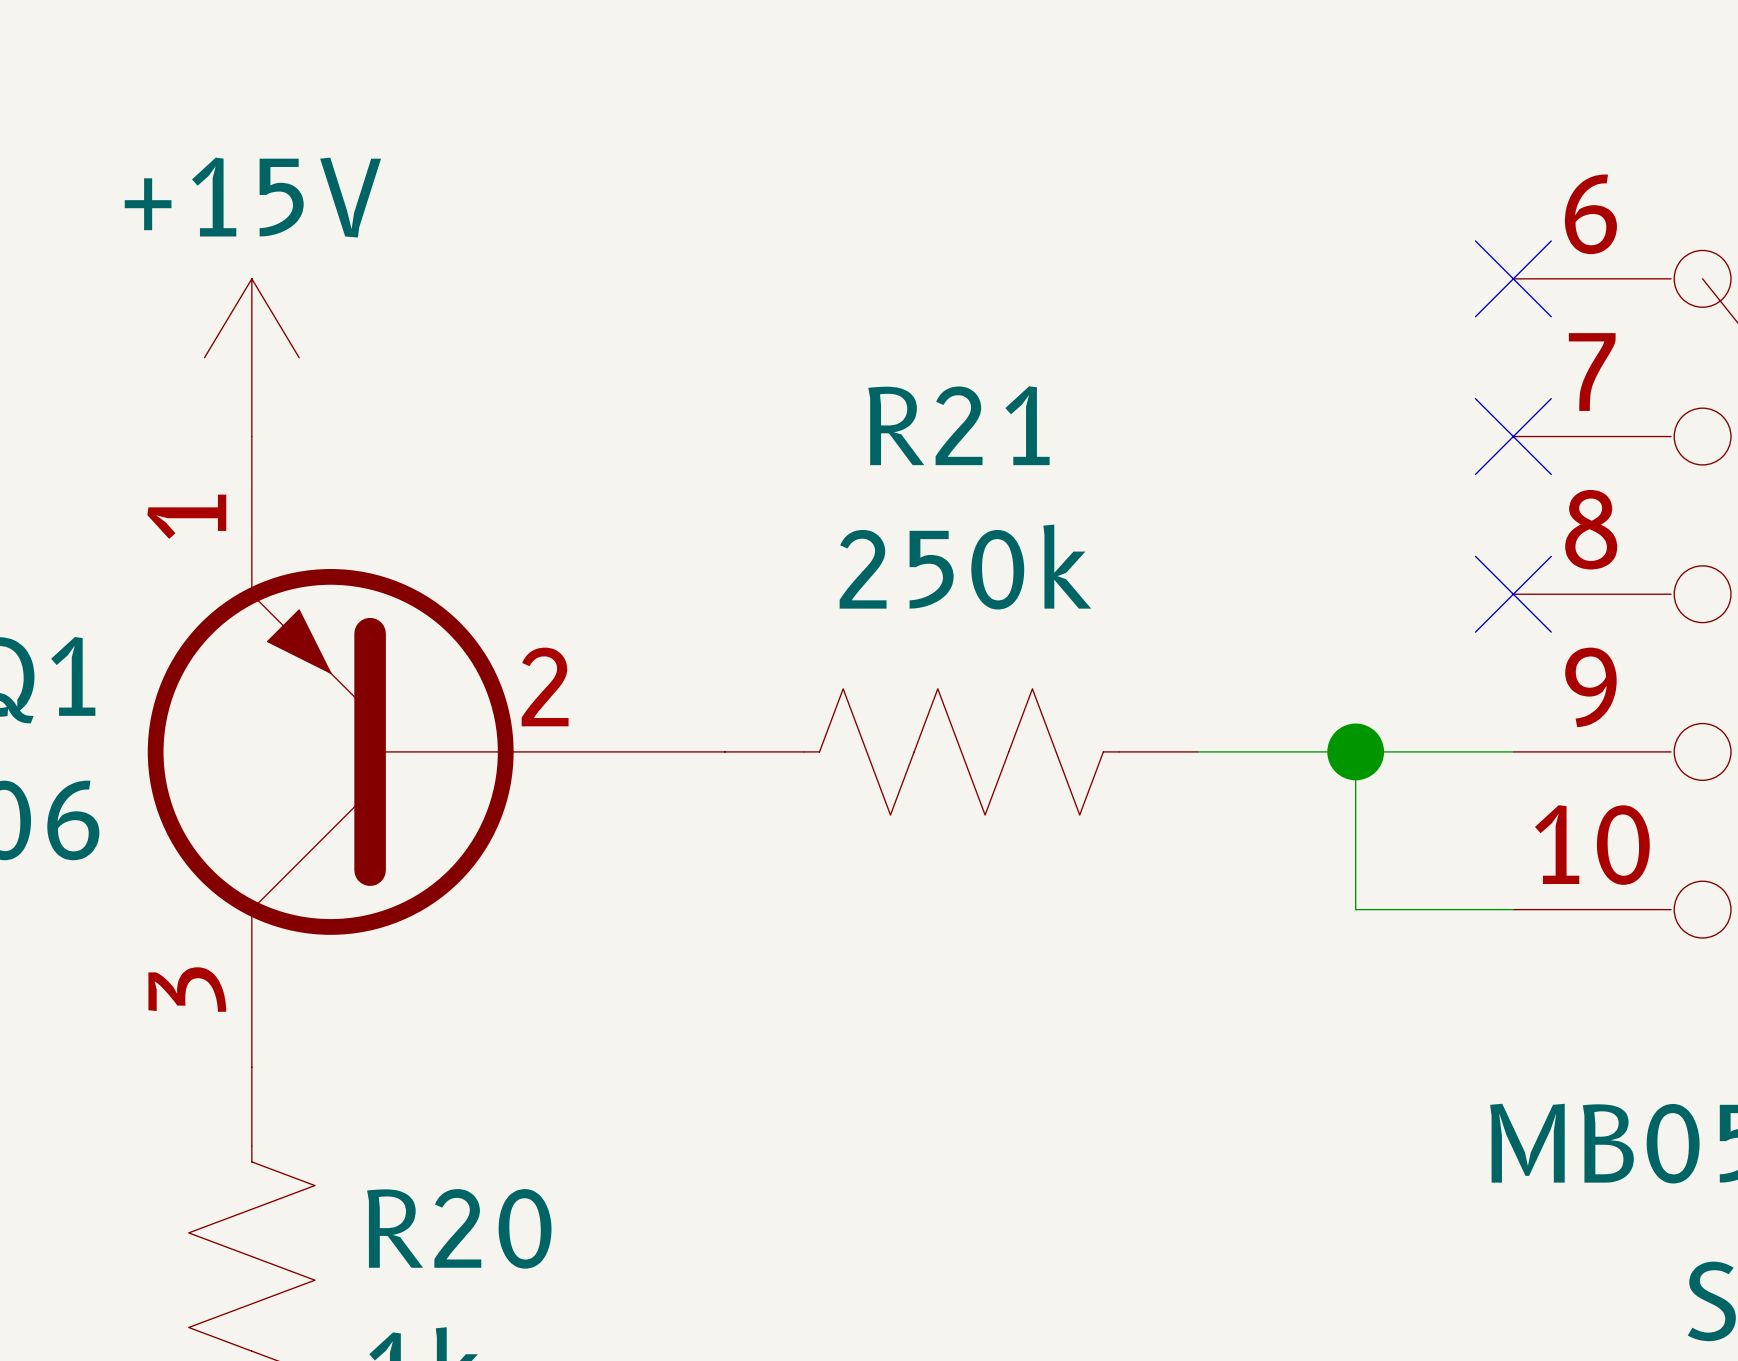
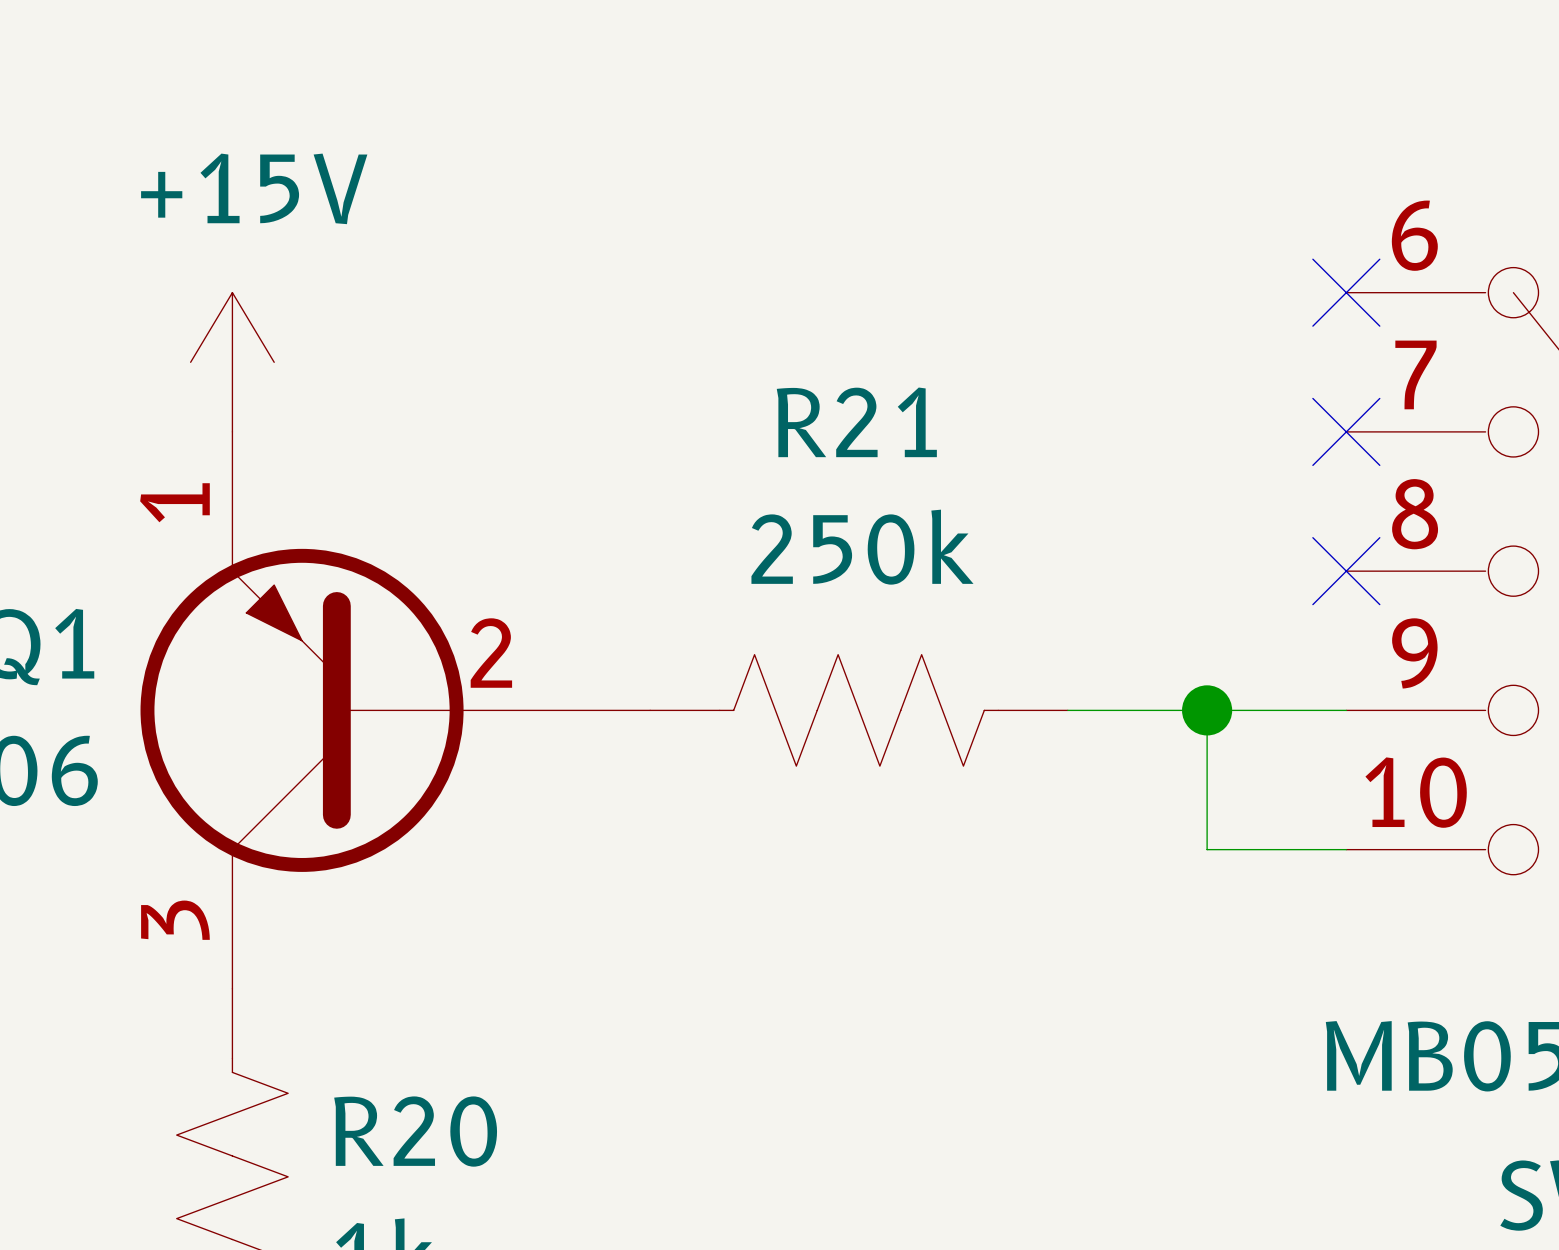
power symbol text position: +15V (252, 197) -> +15V (254, 188)

